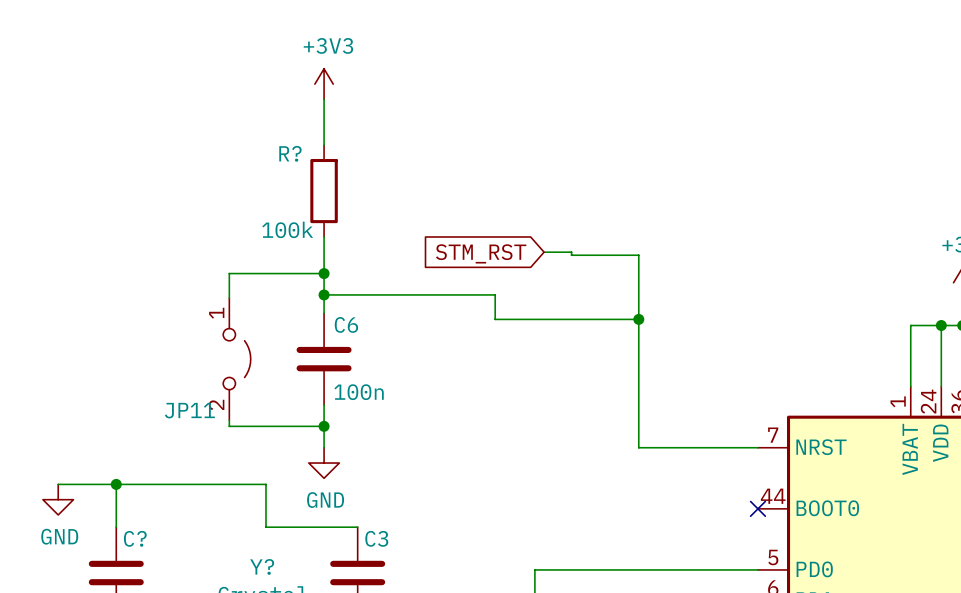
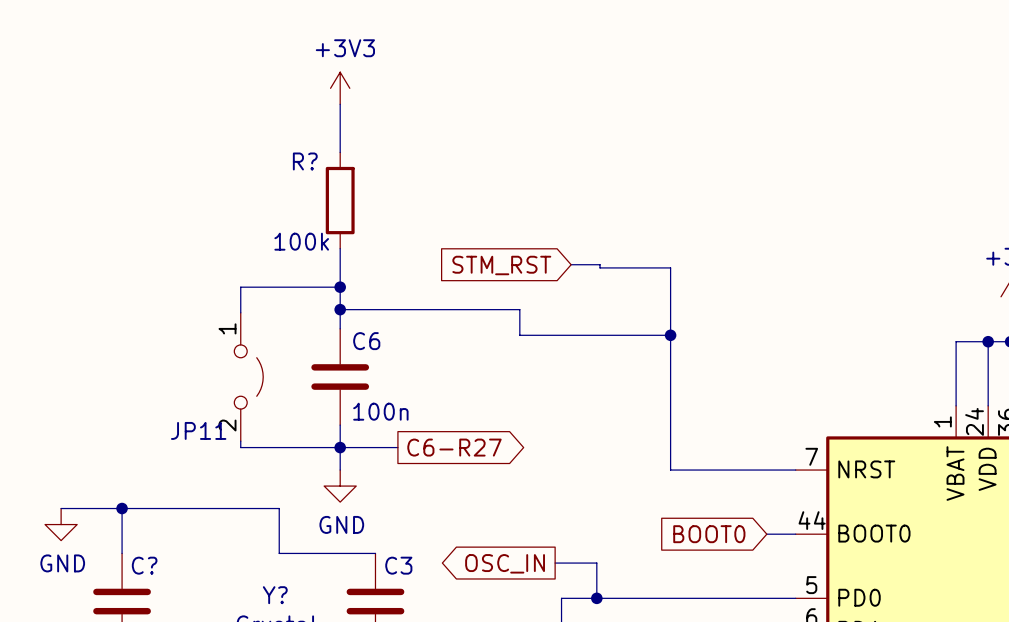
wire: none -> (340, 447) (397, 447)
global label: none -> C6-R27 (454, 447)
global label: none -> BOOT0 (709, 534)
wire: none -> (766, 534) (795, 534)
no-connect mark: (757, 508) -> none
wire: none -> (555, 563) (596, 563) (596, 598)
global label: none -> OSC_IN (505, 563)
junction: none -> (596, 598)

